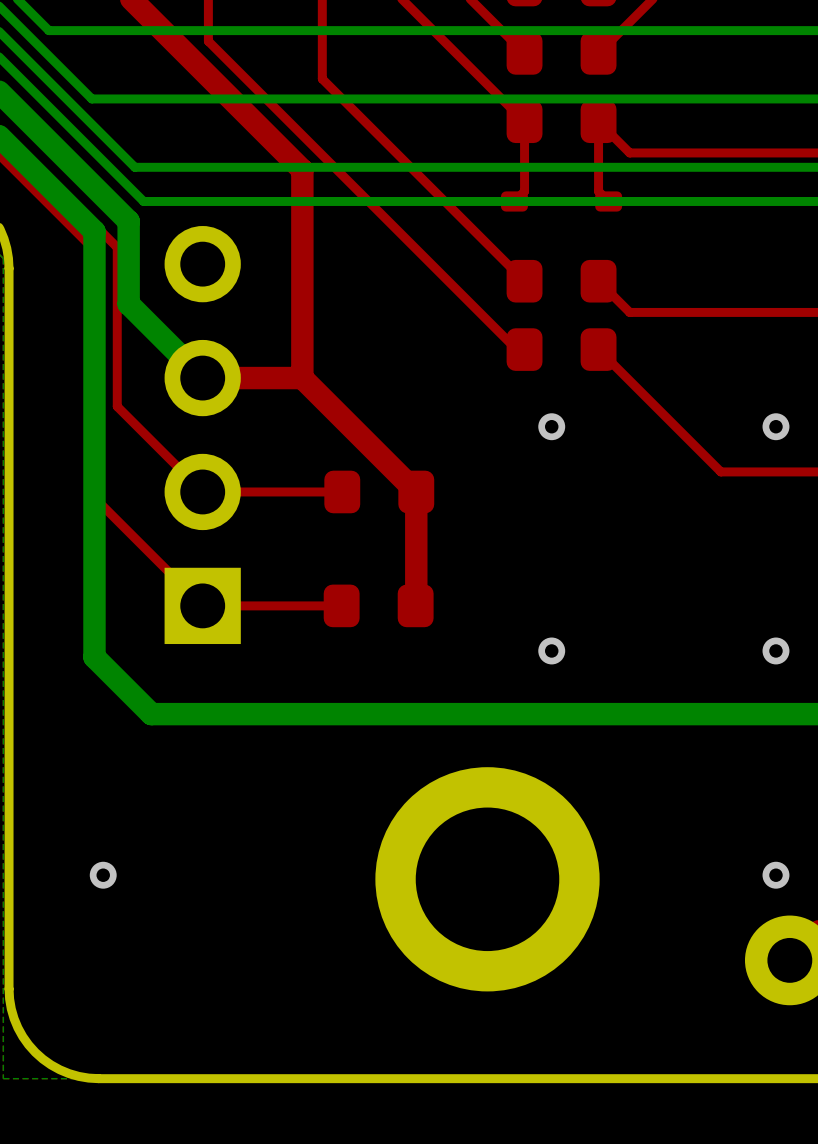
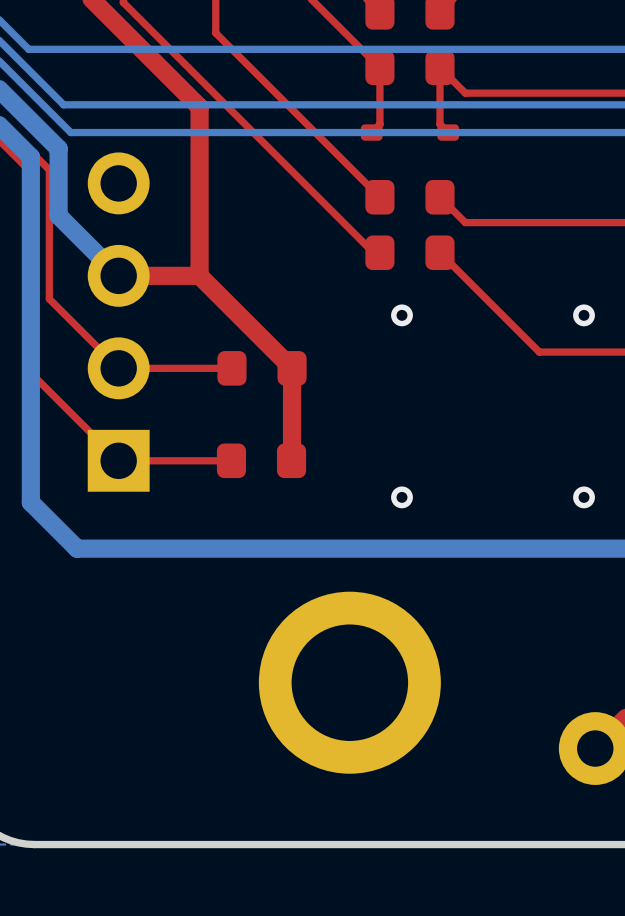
via: (103, 875) -> none
via: (775, 875) -> none

